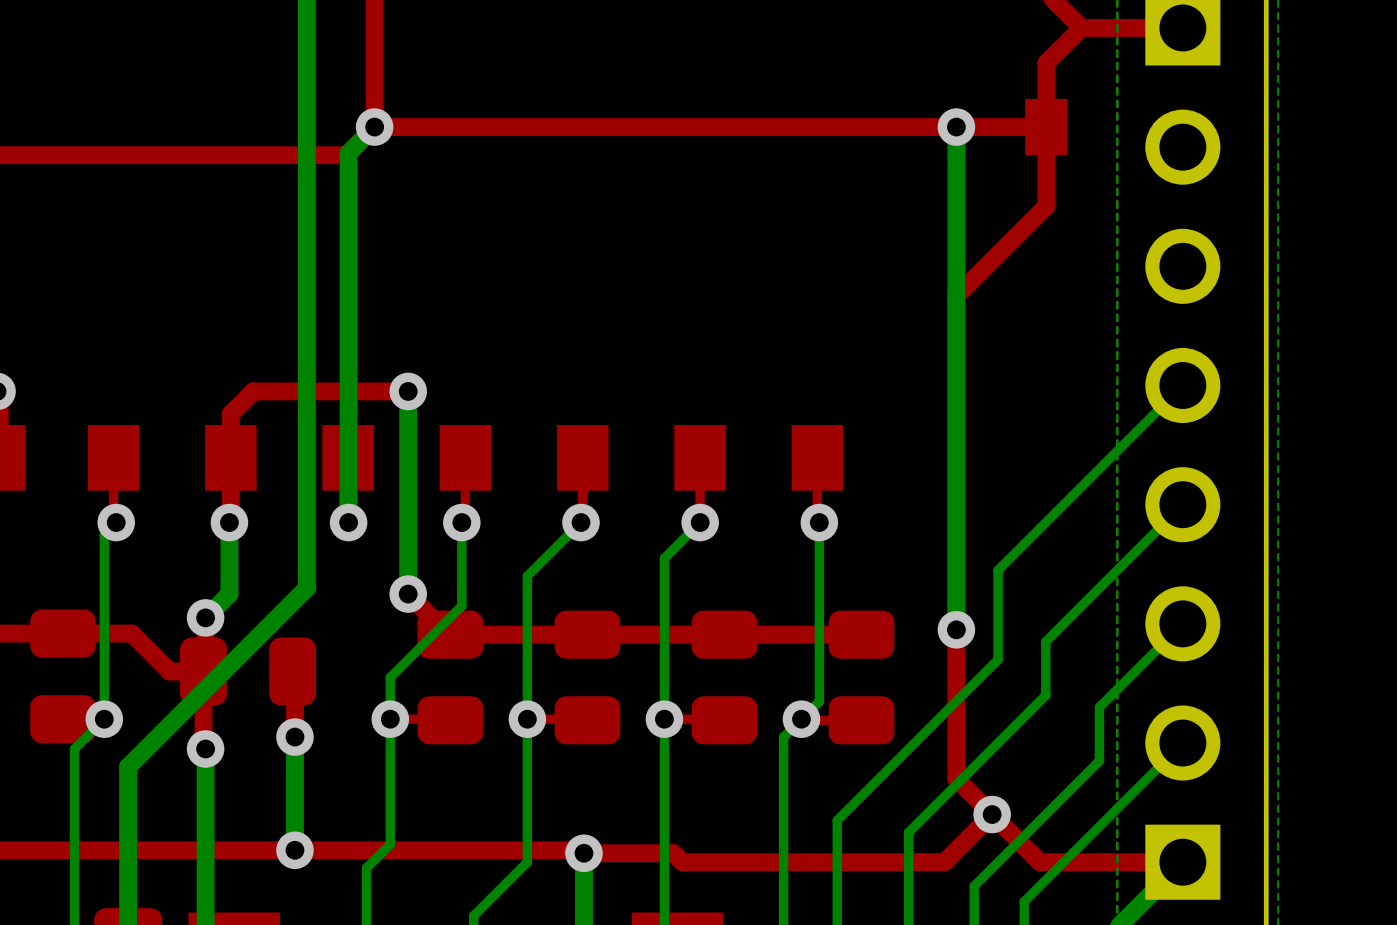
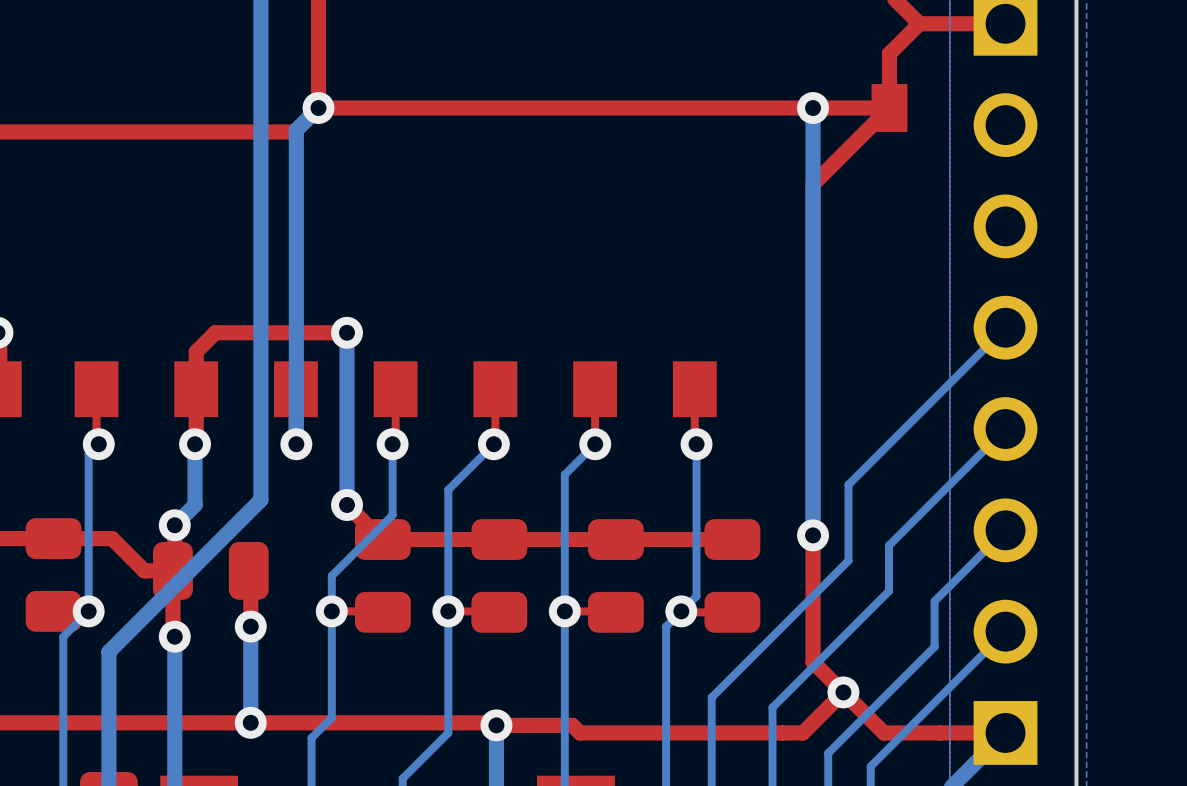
top track: (1046, 127) (1046, 206) (956, 296) -> (889, 108) (813, 184) (813, 251)

